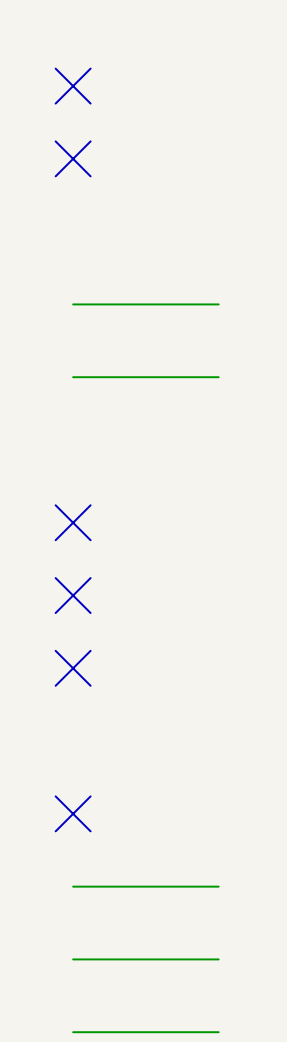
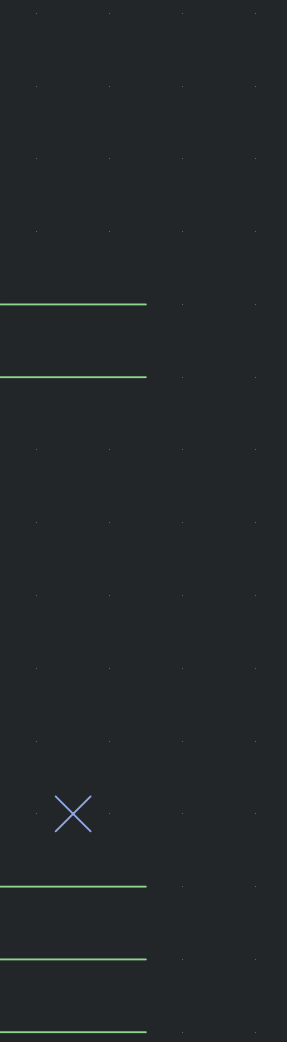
no-connect mark: (73, 86) -> none
no-connect mark: (73, 158) -> none
wire: (145, 304) (218, 304) -> (0, 304) (73, 304)
wire: (145, 377) (218, 377) -> (0, 377) (73, 377)
no-connect mark: (73, 522) -> none
no-connect mark: (73, 595) -> none
no-connect mark: (73, 668) -> none
wire: (145, 886) (218, 886) -> (0, 886) (73, 886)
wire: (145, 959) (218, 959) -> (0, 959) (73, 959)
wire: (145, 1032) (218, 1032) -> (0, 1032) (73, 1032)

